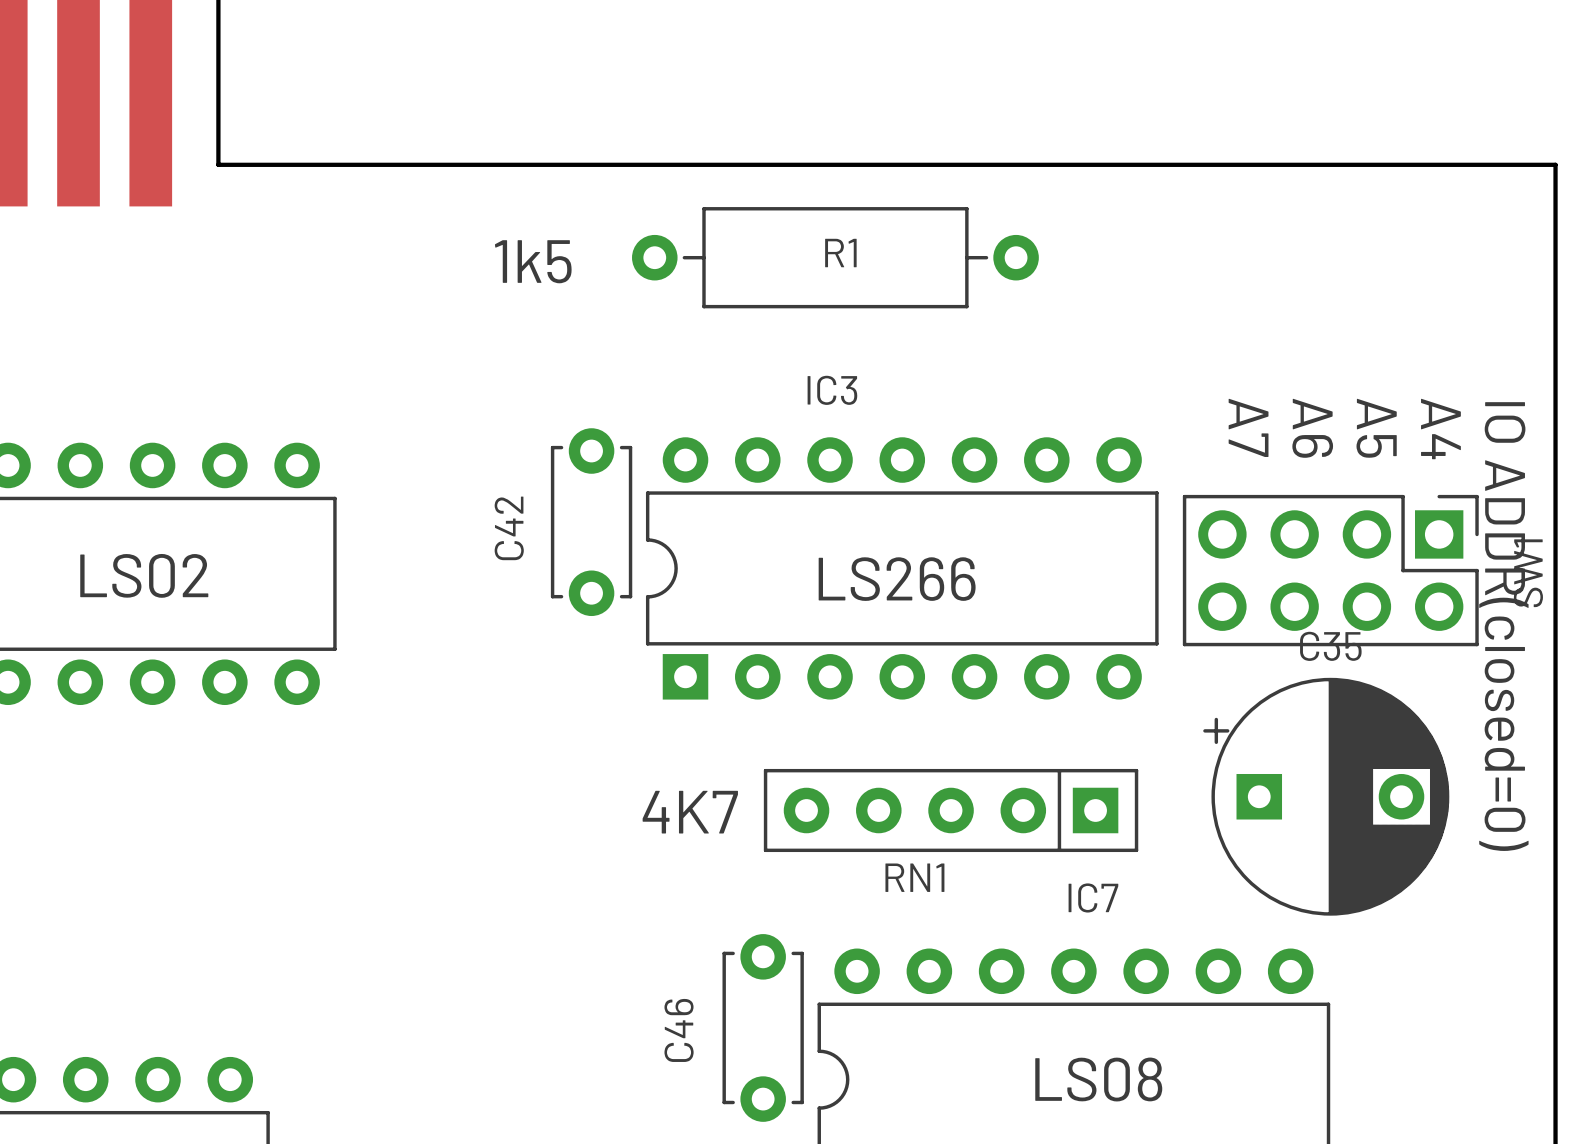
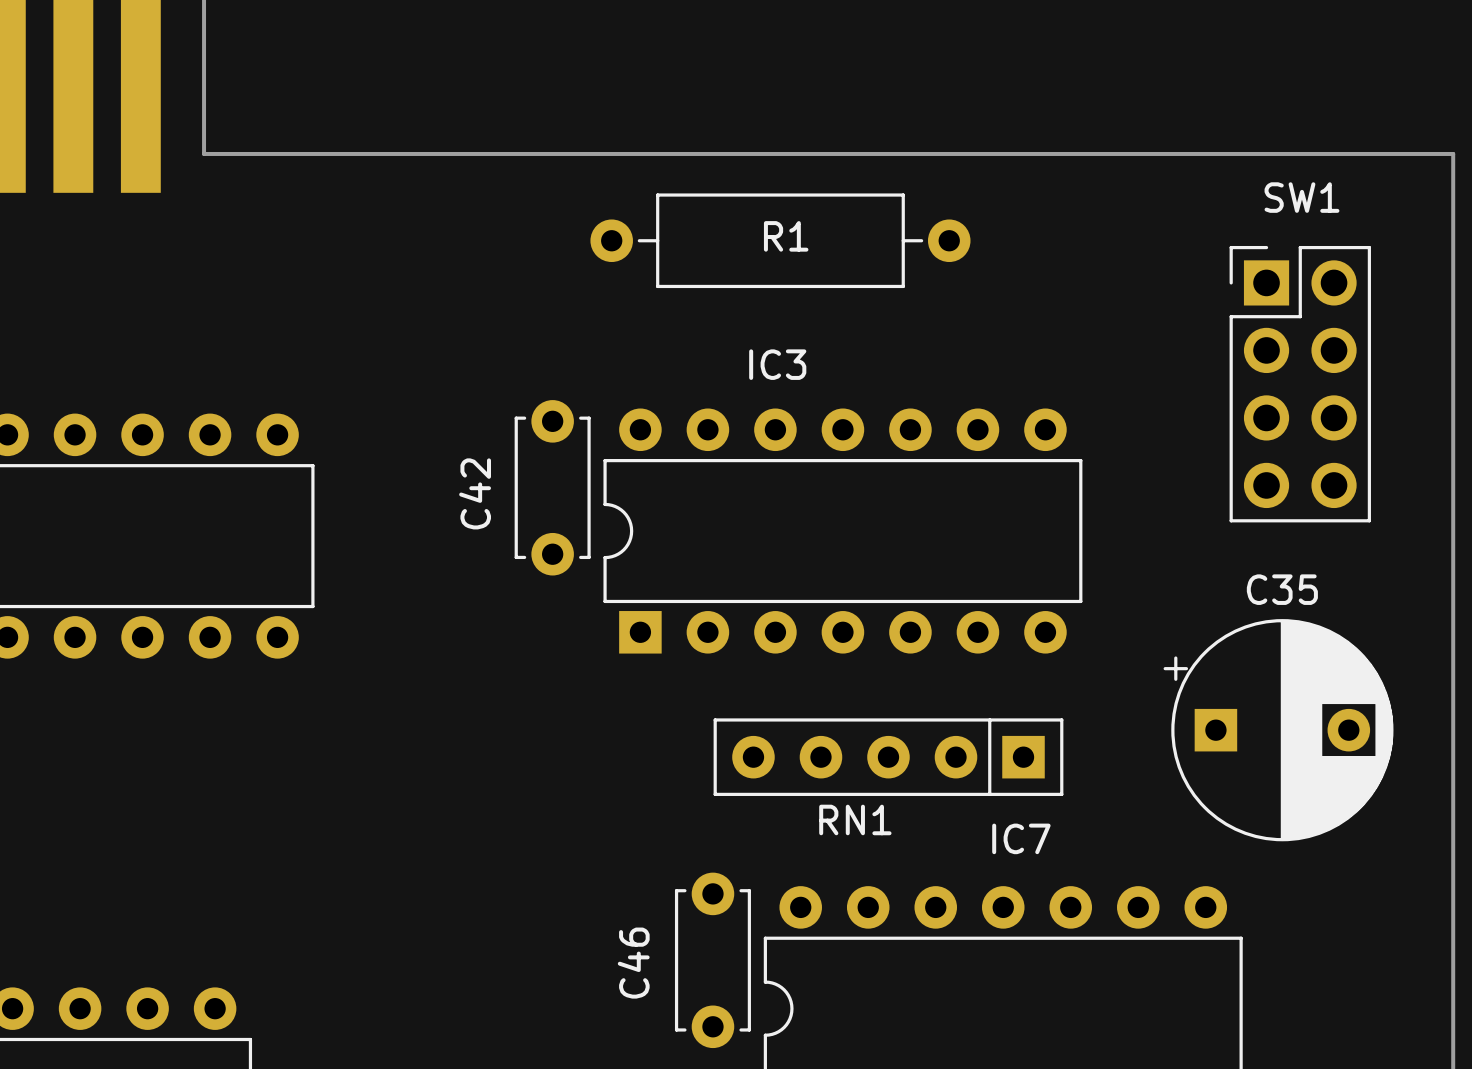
text: 1k5 (533, 261) -> none
text: A7 (1248, 427) -> none
text: A6 (1312, 428) -> none
text: A5 (1376, 428) -> none
text: A4 (1440, 428) -> none
SW1 rotation: 0° (1330, 570) -> 90° counterclockwise (1300, 384)
text: LS02 (144, 575) -> none
text: LS266 (897, 579) -> none
text: IO ADDR(closed=0) (1503, 626) -> none
C35 position: (1326, 796) -> (1278, 730)
text: 4K7 (690, 812) -> none
text: LS08 (1098, 1079) -> none

